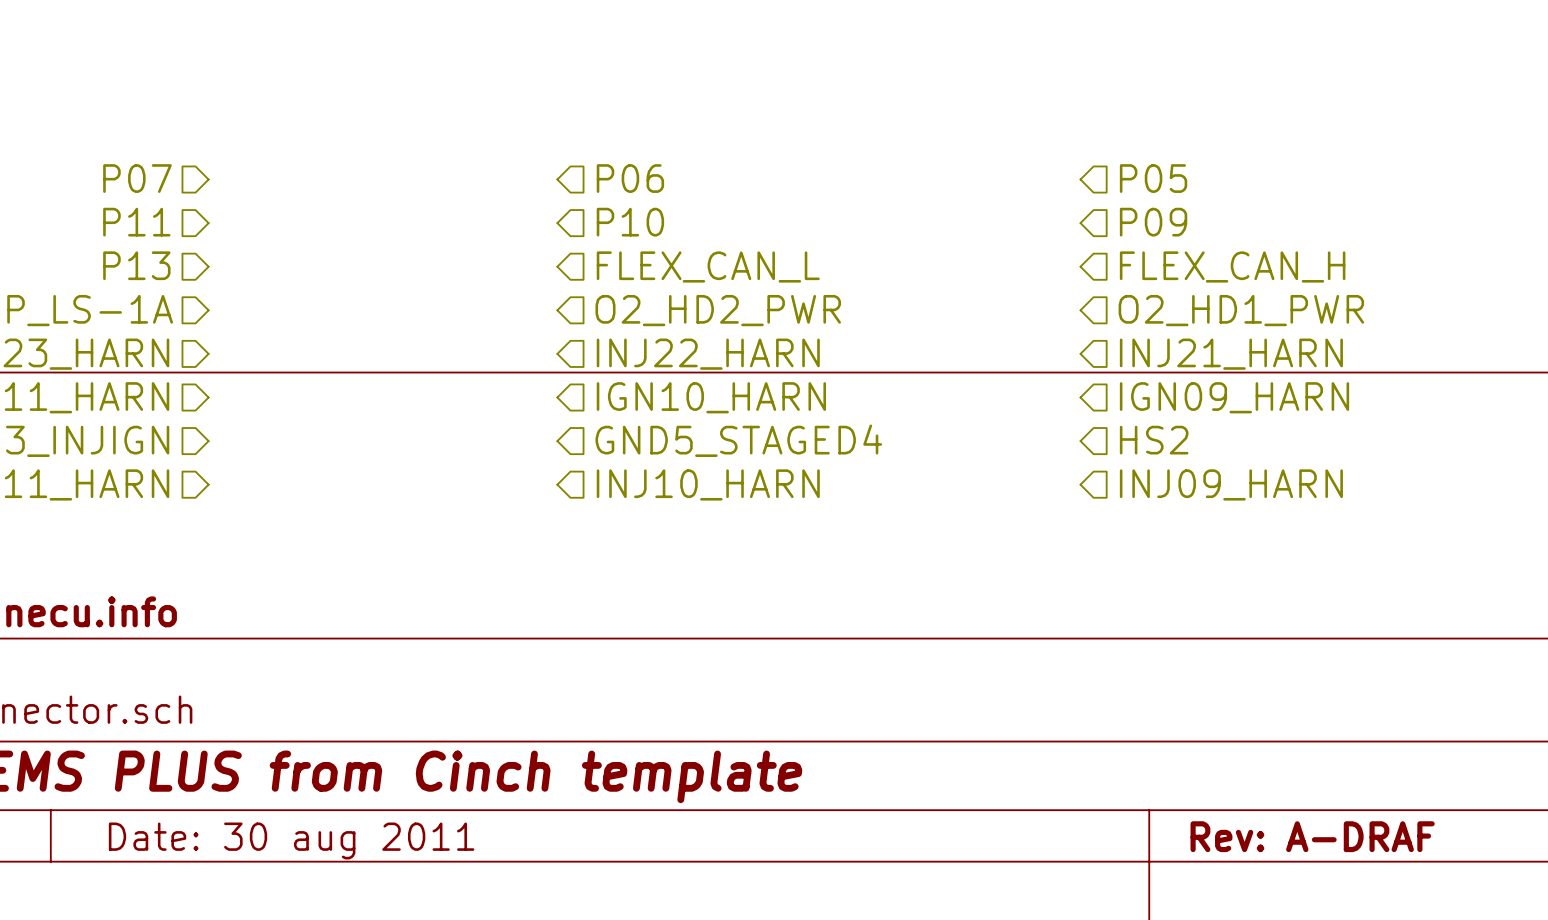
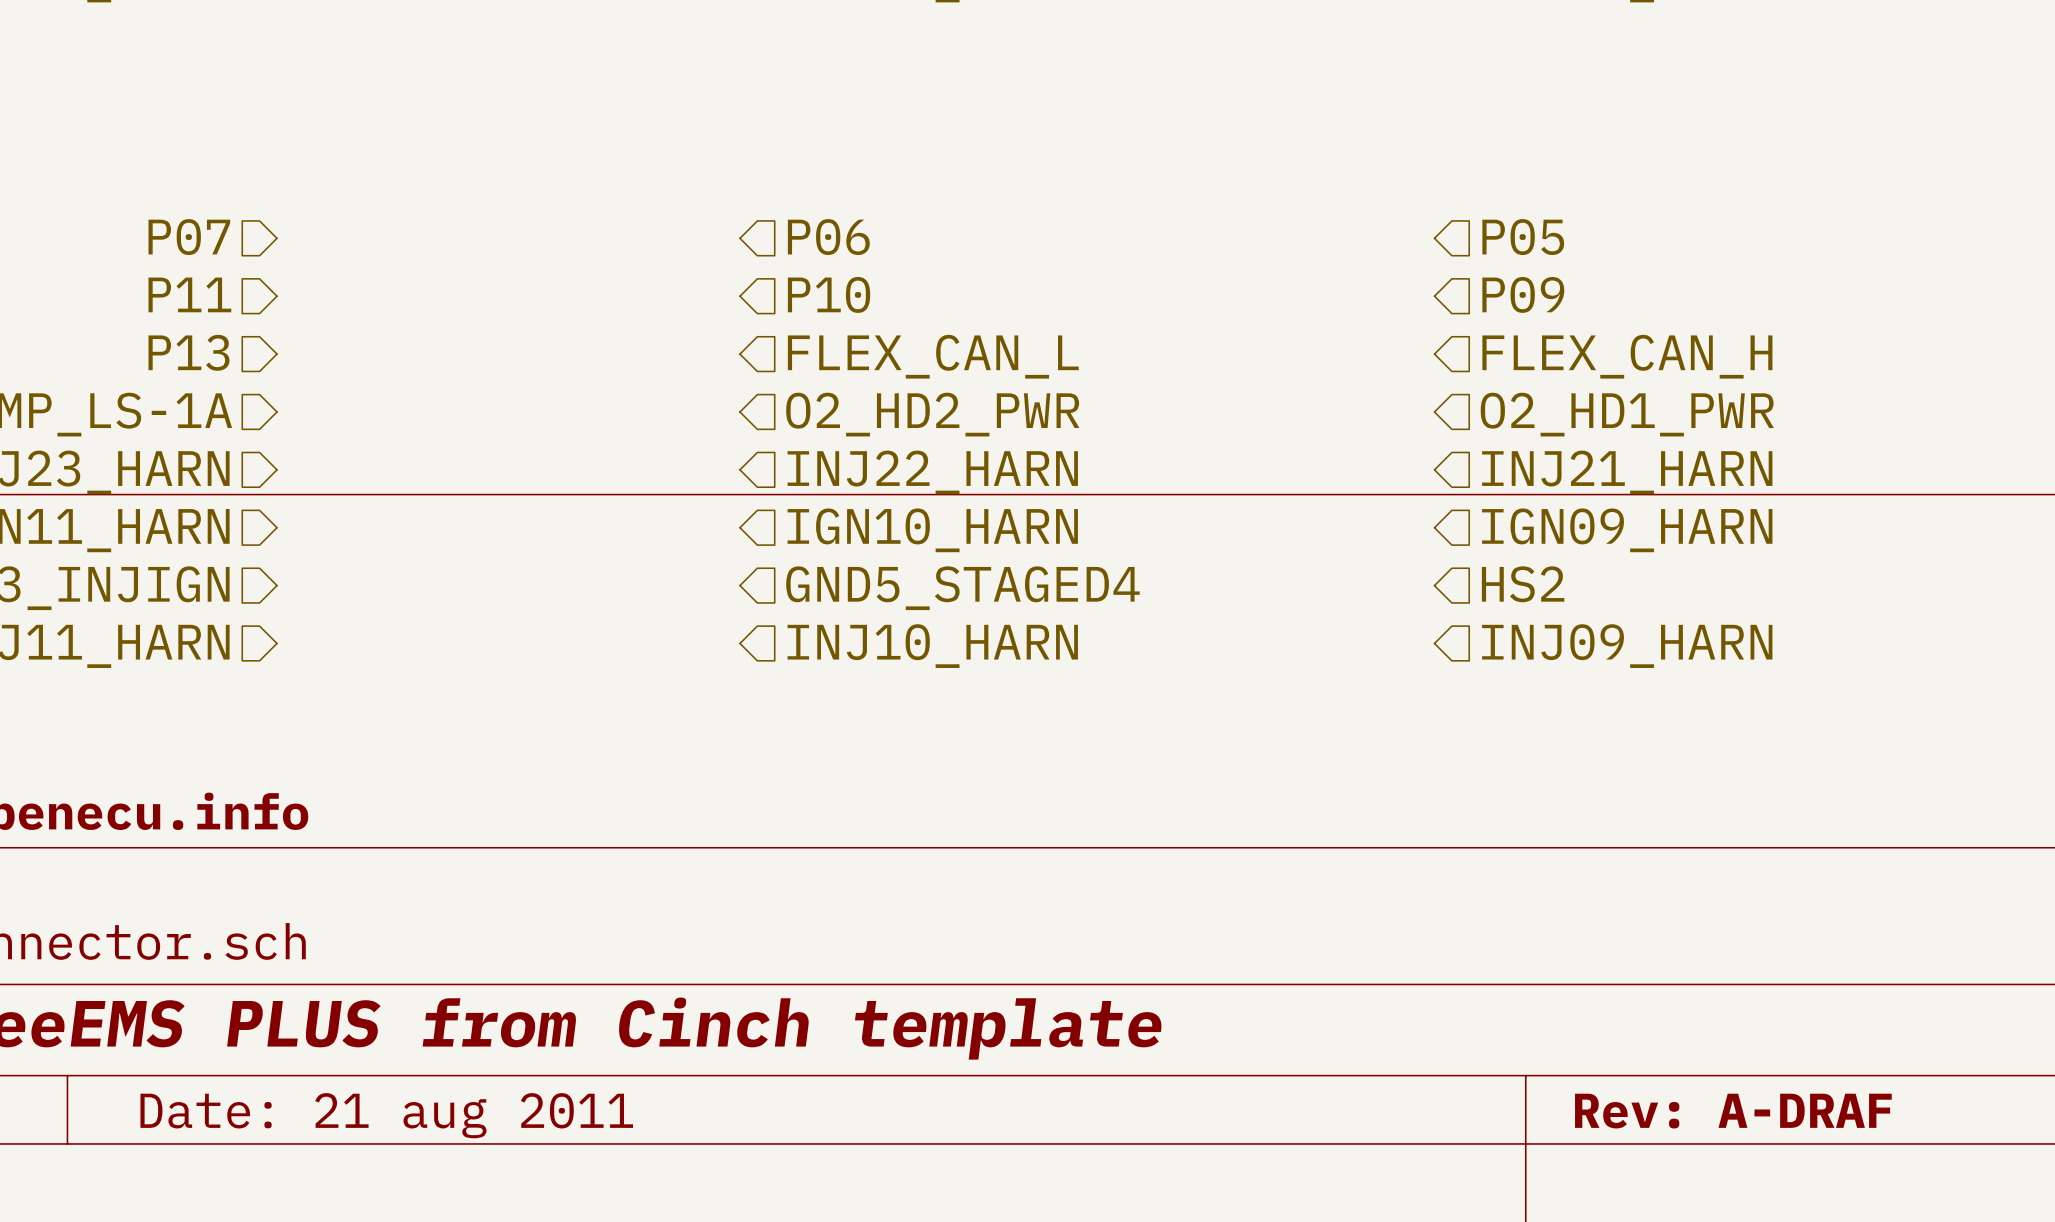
title block: Date: 30 aug 2011 (291, 840) -> Date: 21 aug 2011 (386, 1115)

